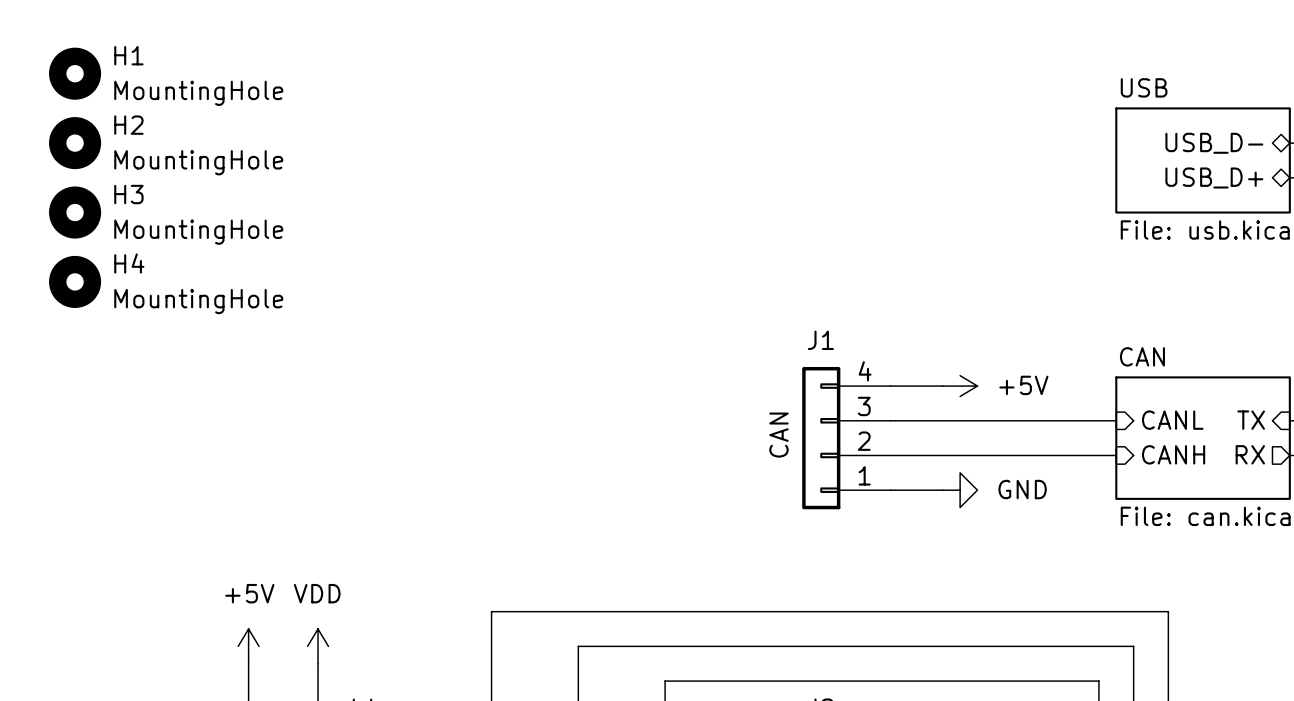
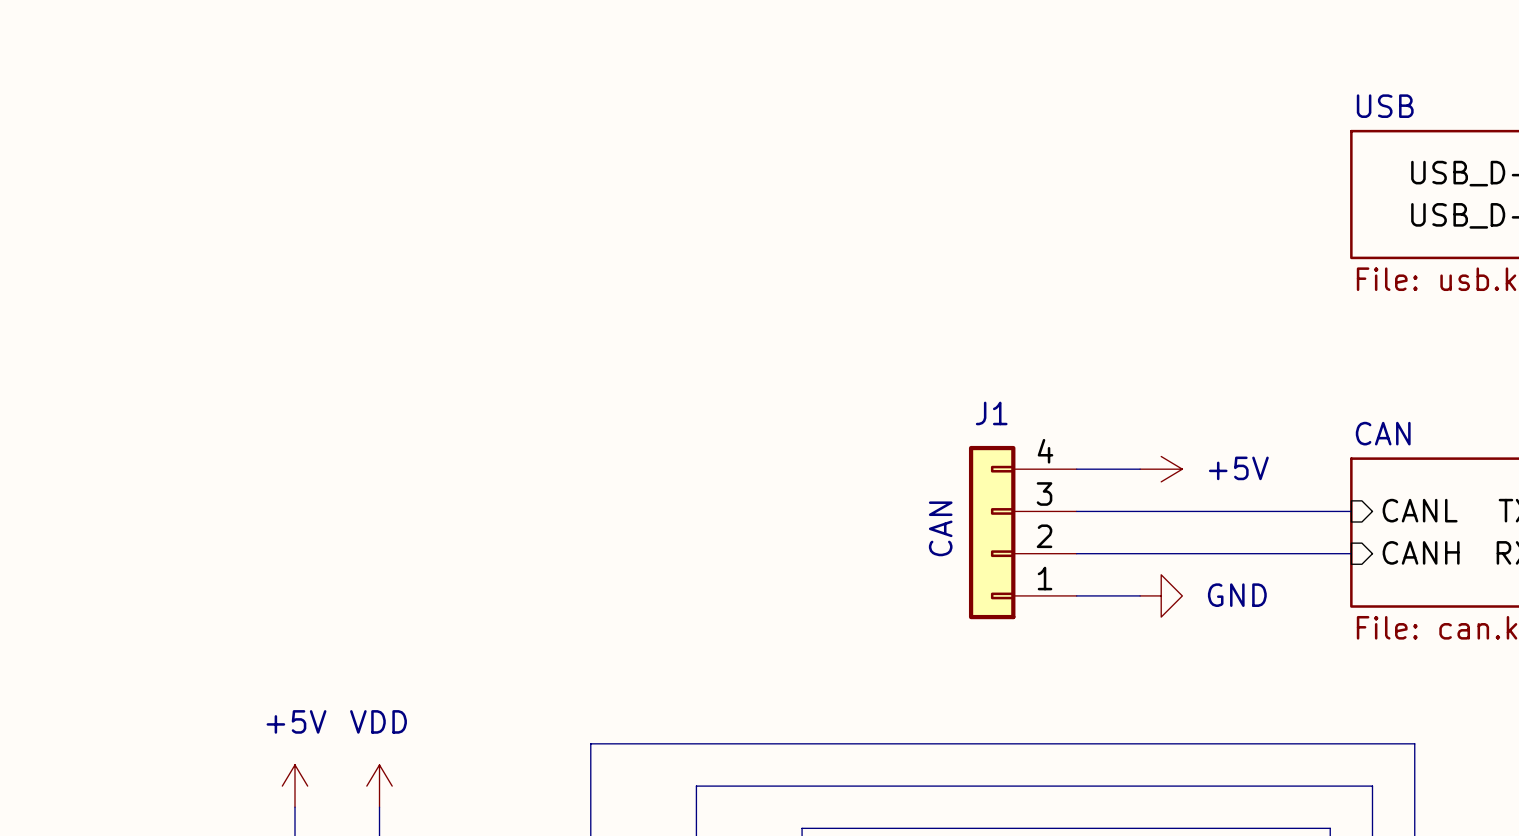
H1: MountingHole (75, 73) -> none
H2: MountingHole (75, 143) -> none
H3: MountingHole (75, 212) -> none
H4: MountingHole (75, 281) -> none

